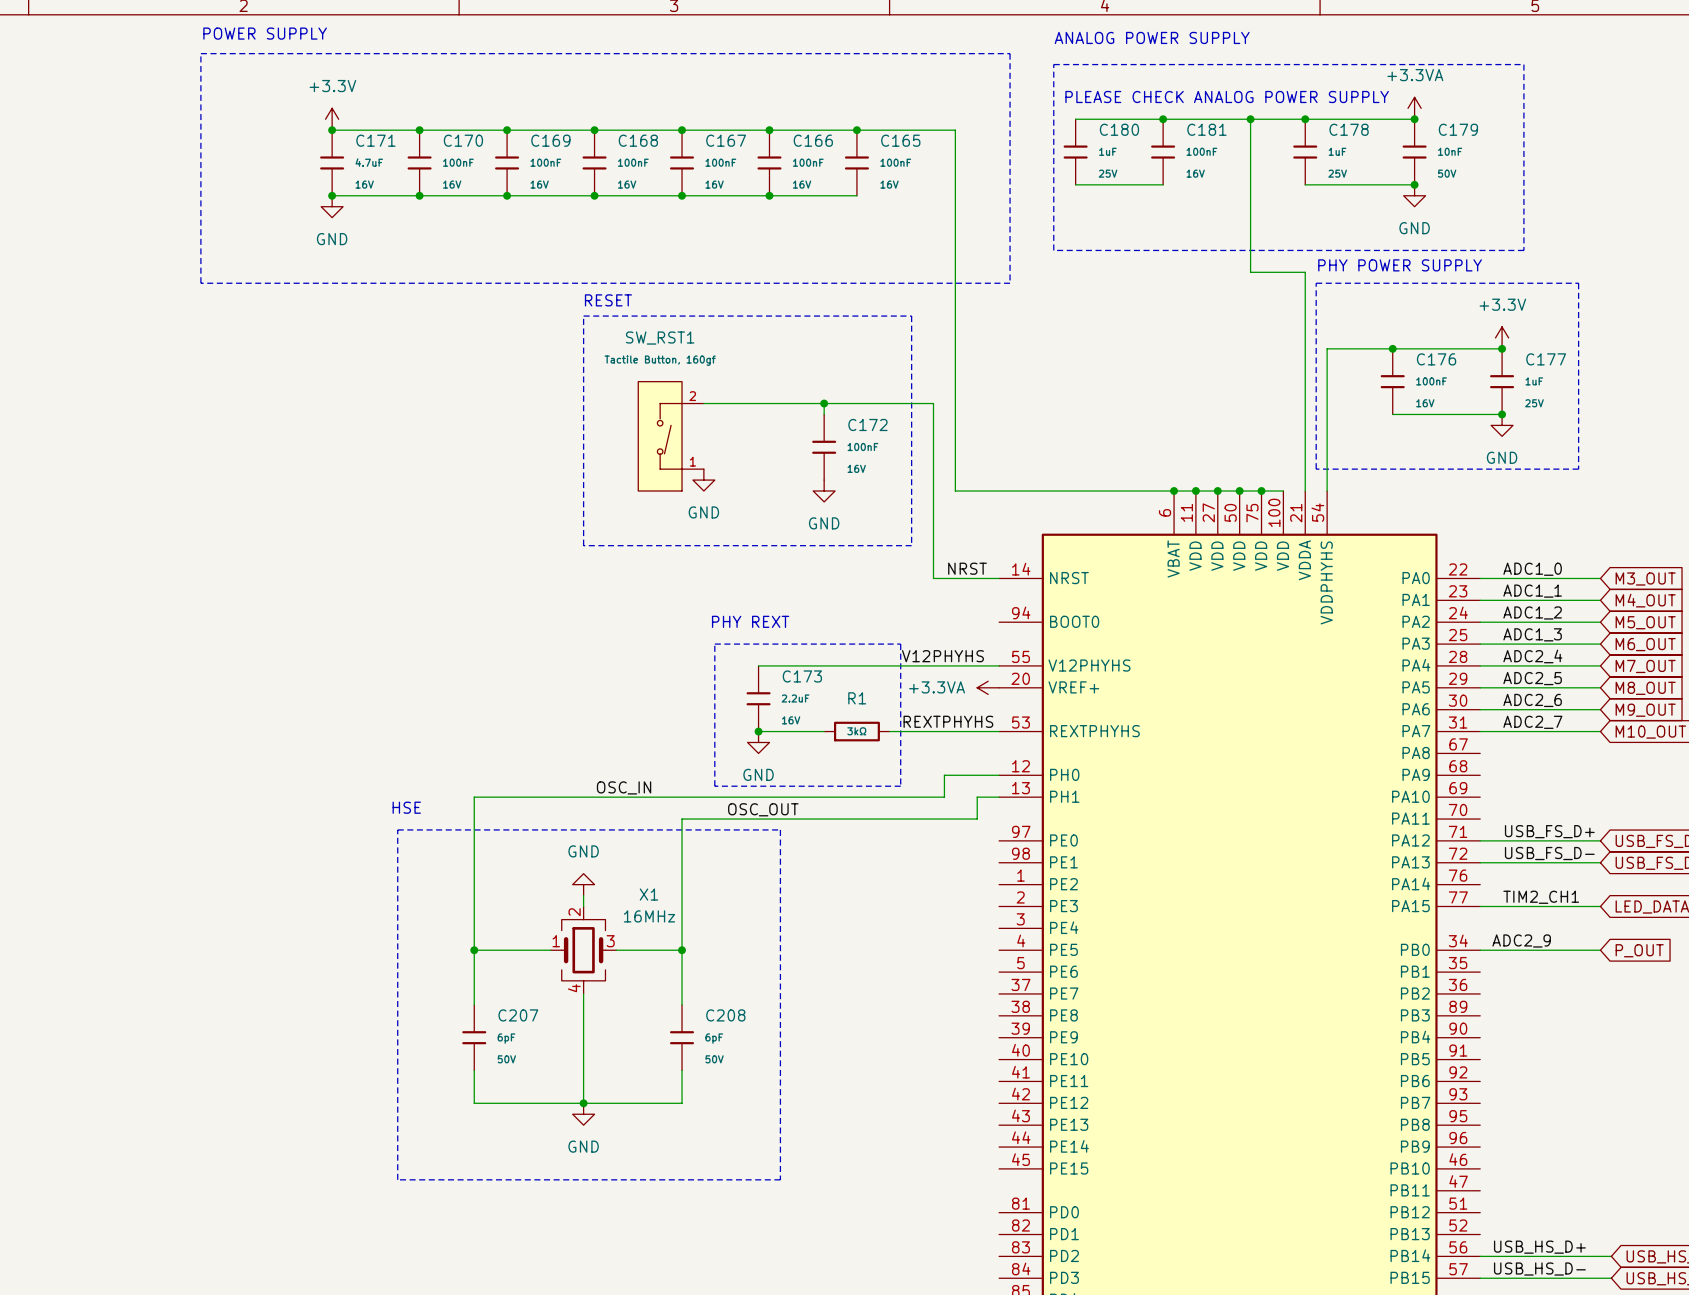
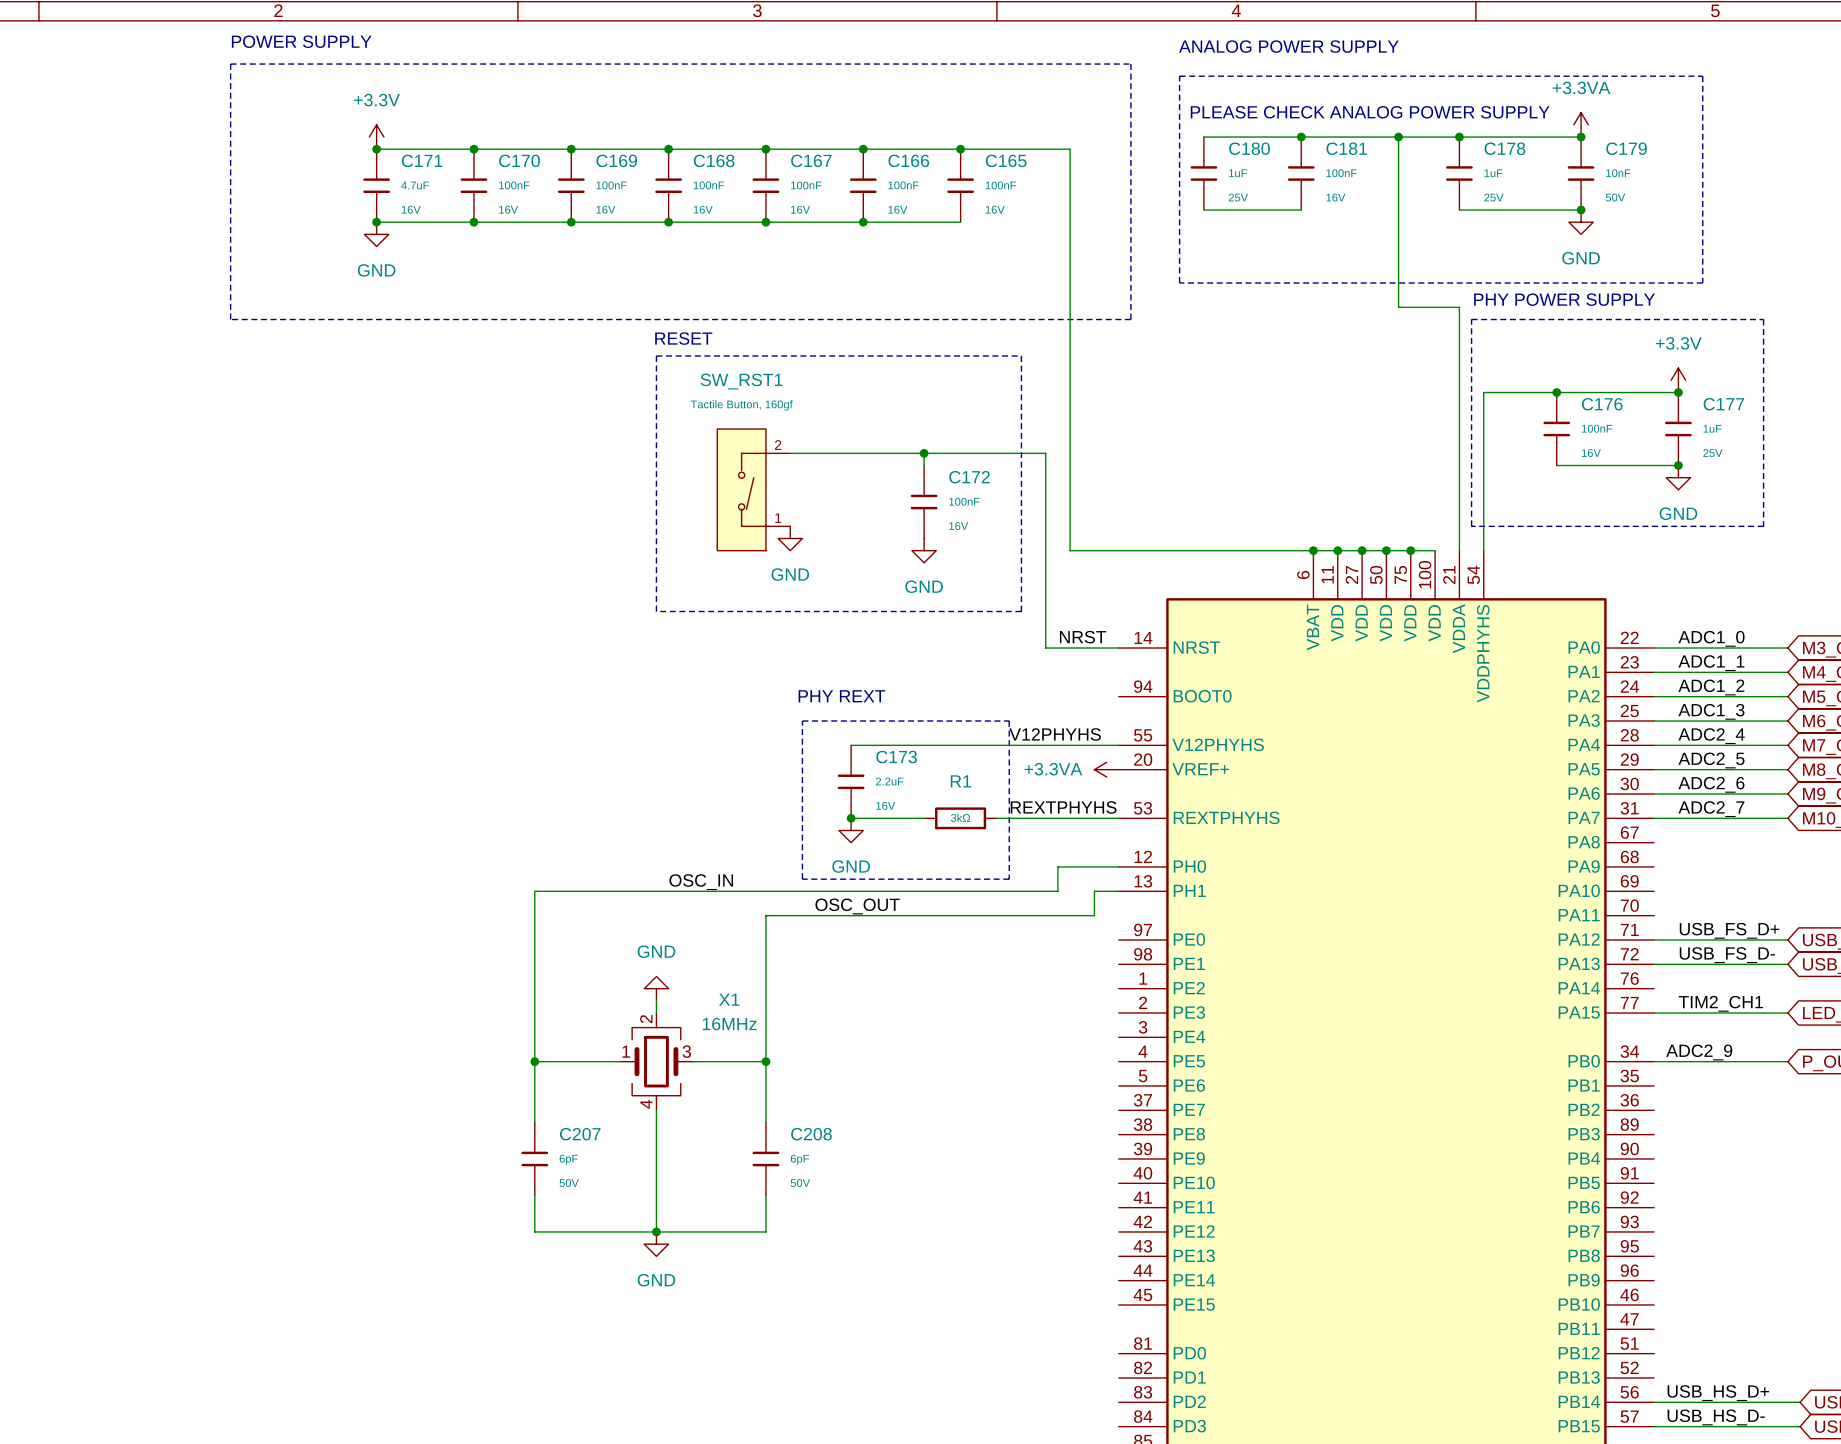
text: HSE (406, 807) -> none
line: (397, 829) (780, 829) (780, 1179) (397, 1179) (397, 829) -> none

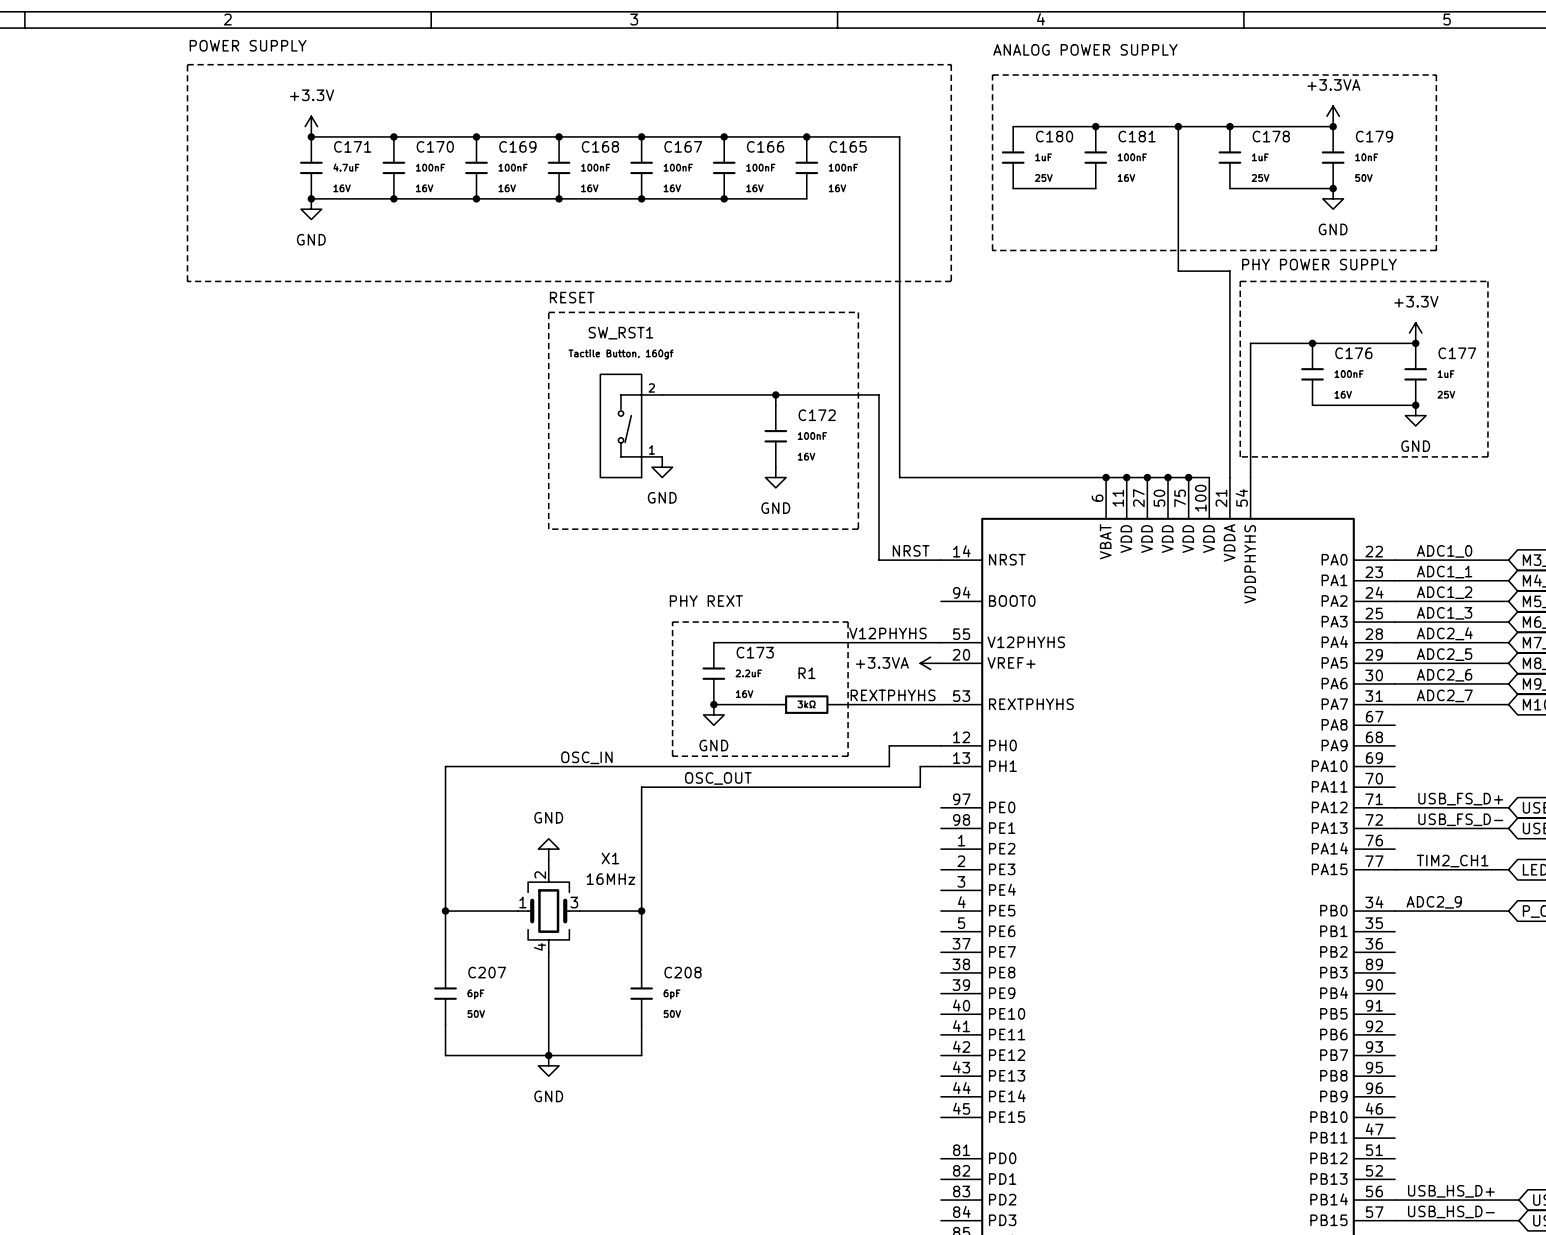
text: PLEASE CHECK ANALOG POWER SUPPLY (1370, 112) -> none

